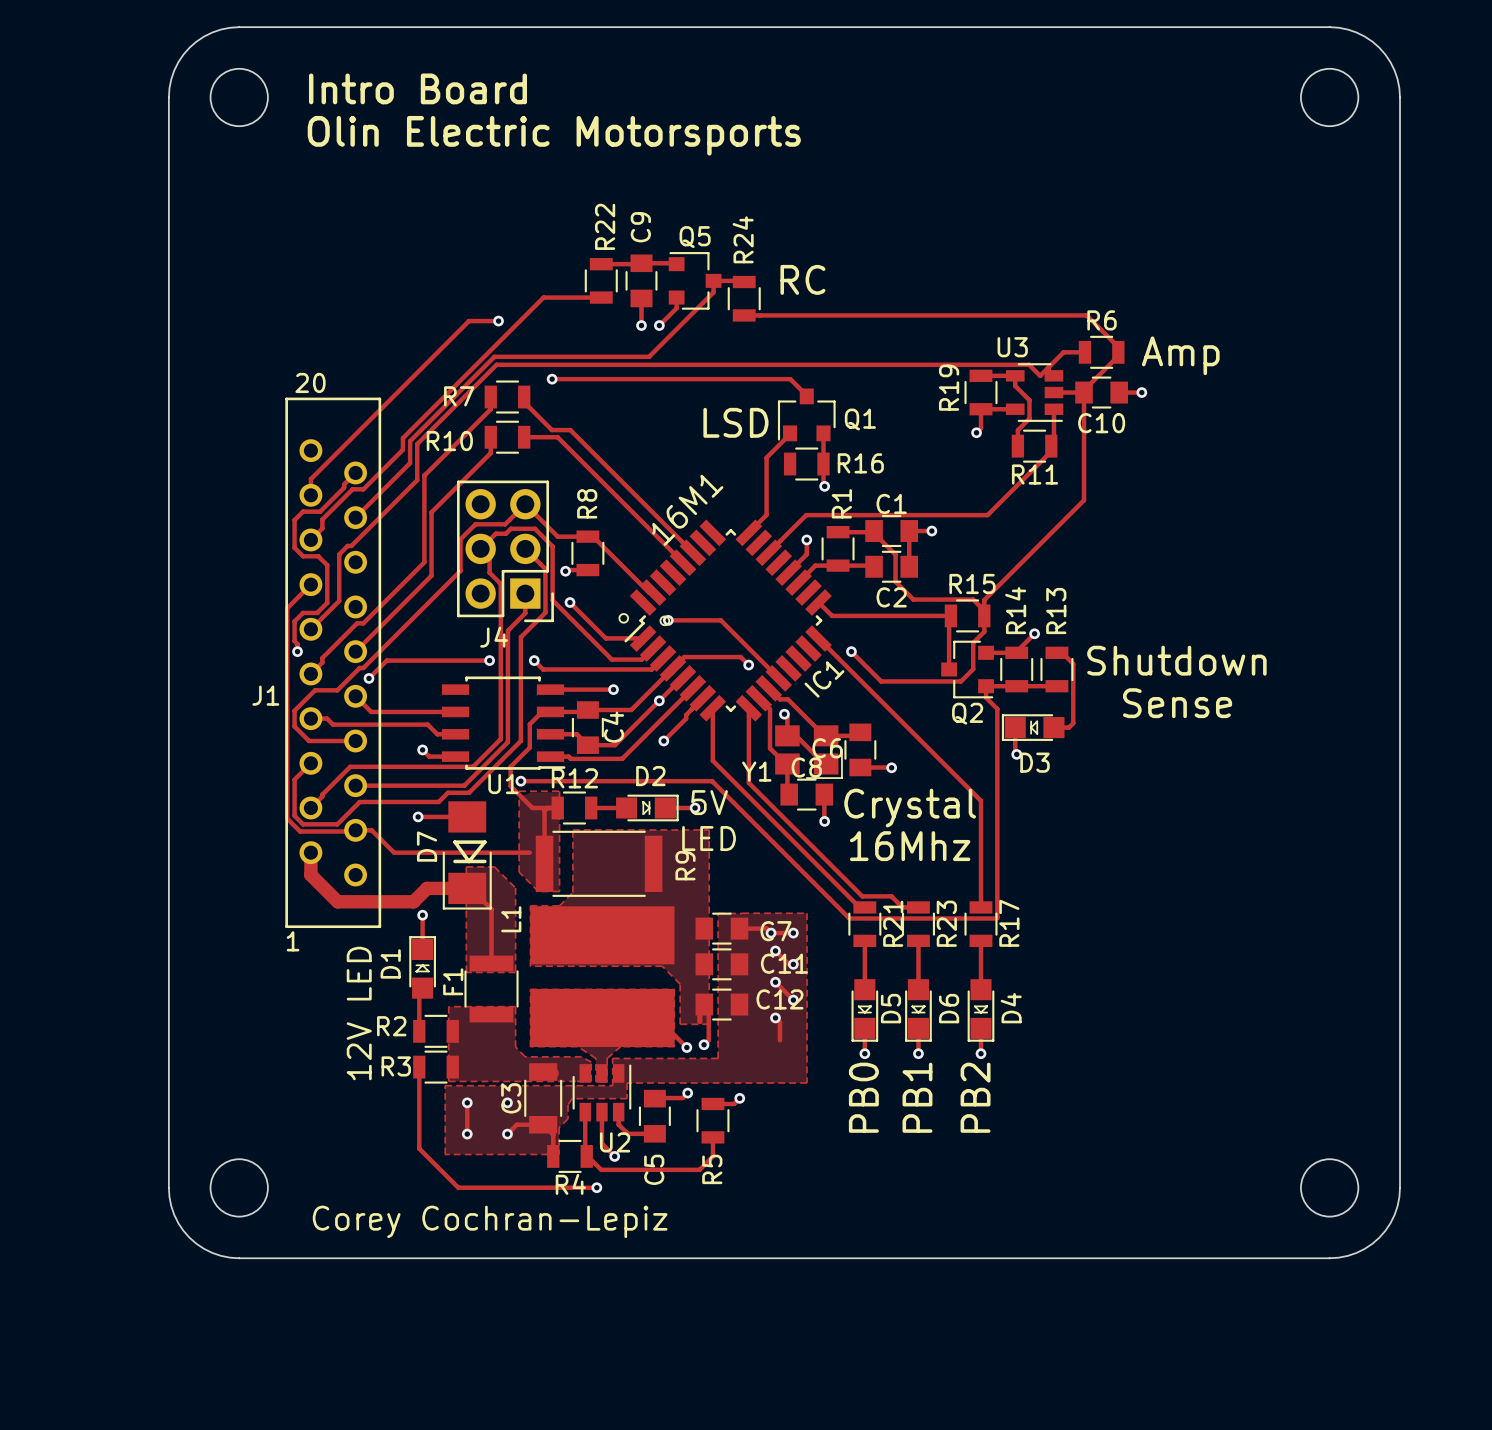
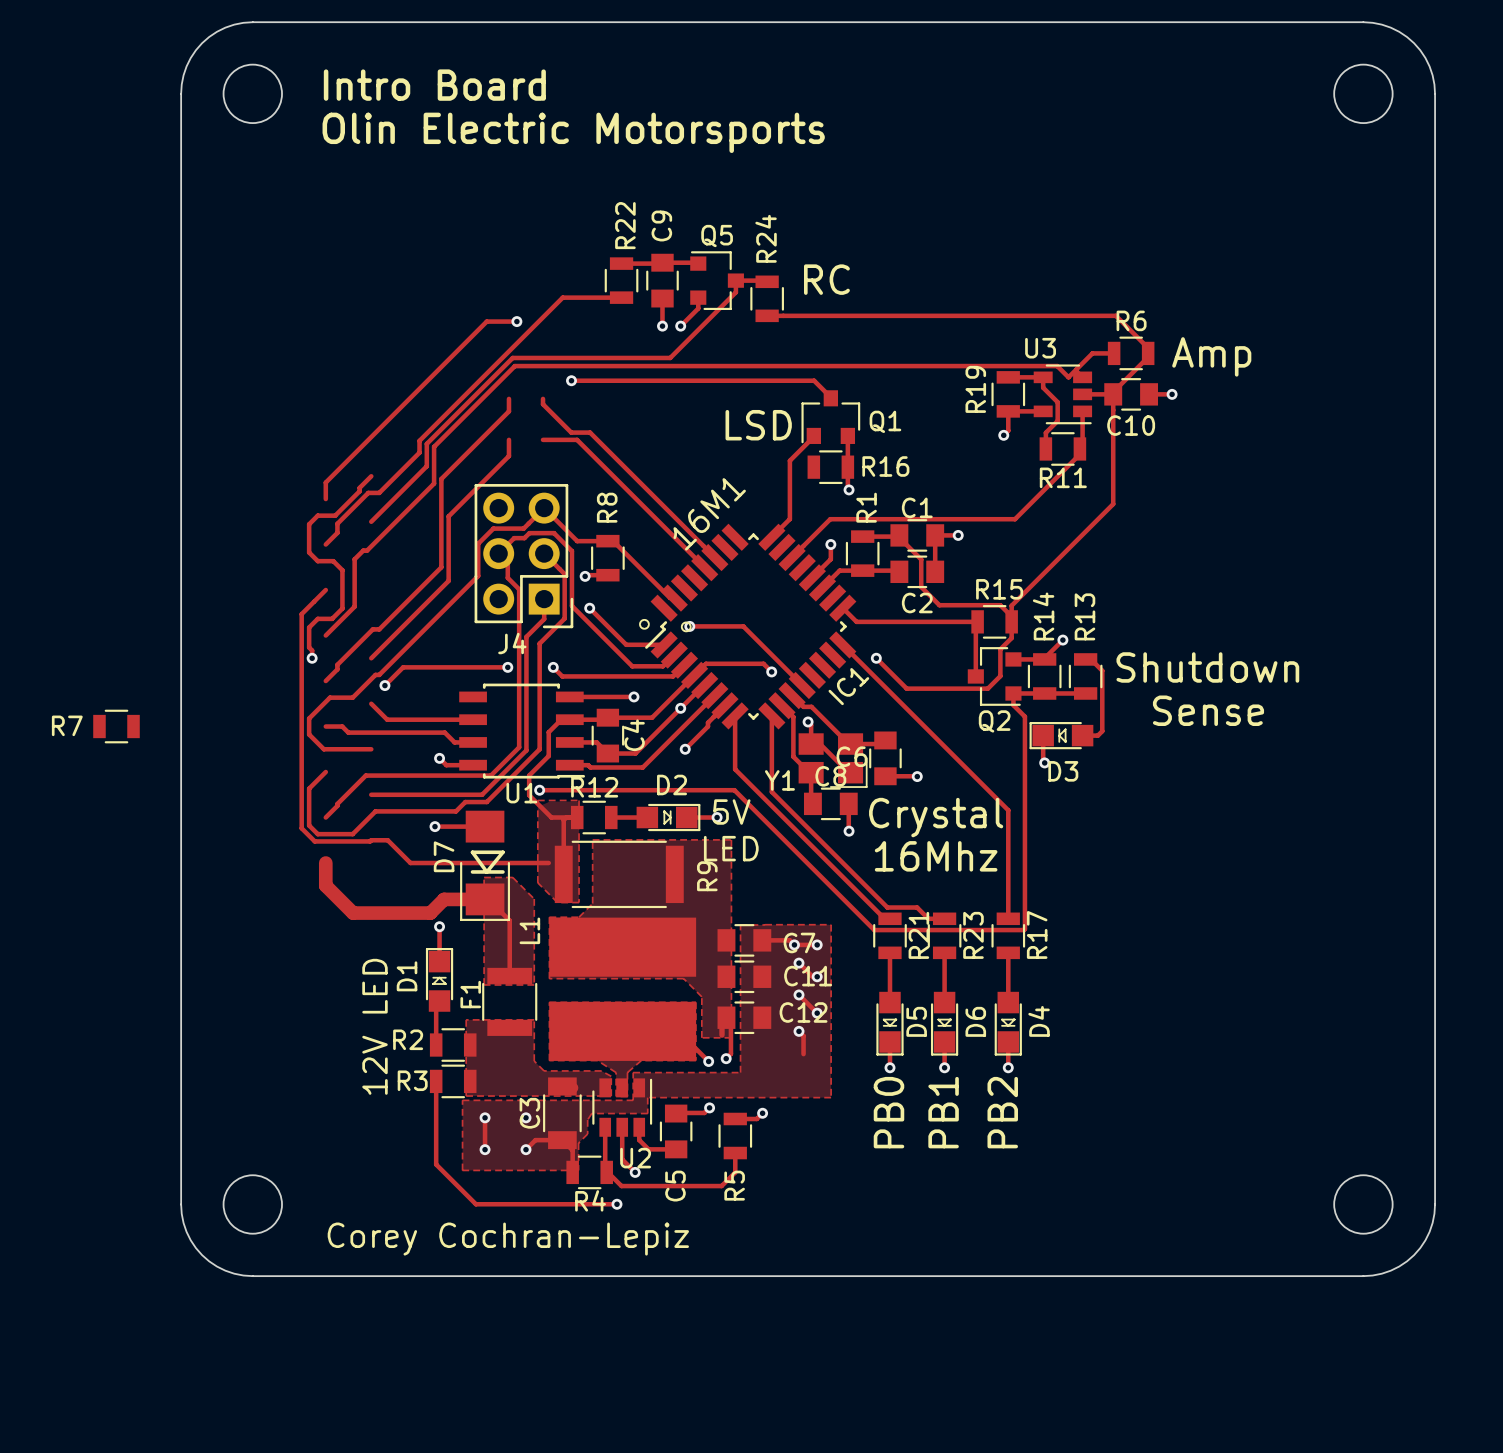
R7 position: (507, 397) -> (116, 726)
R10: (507, 437) -> none
J1: (333, 662) -> none

